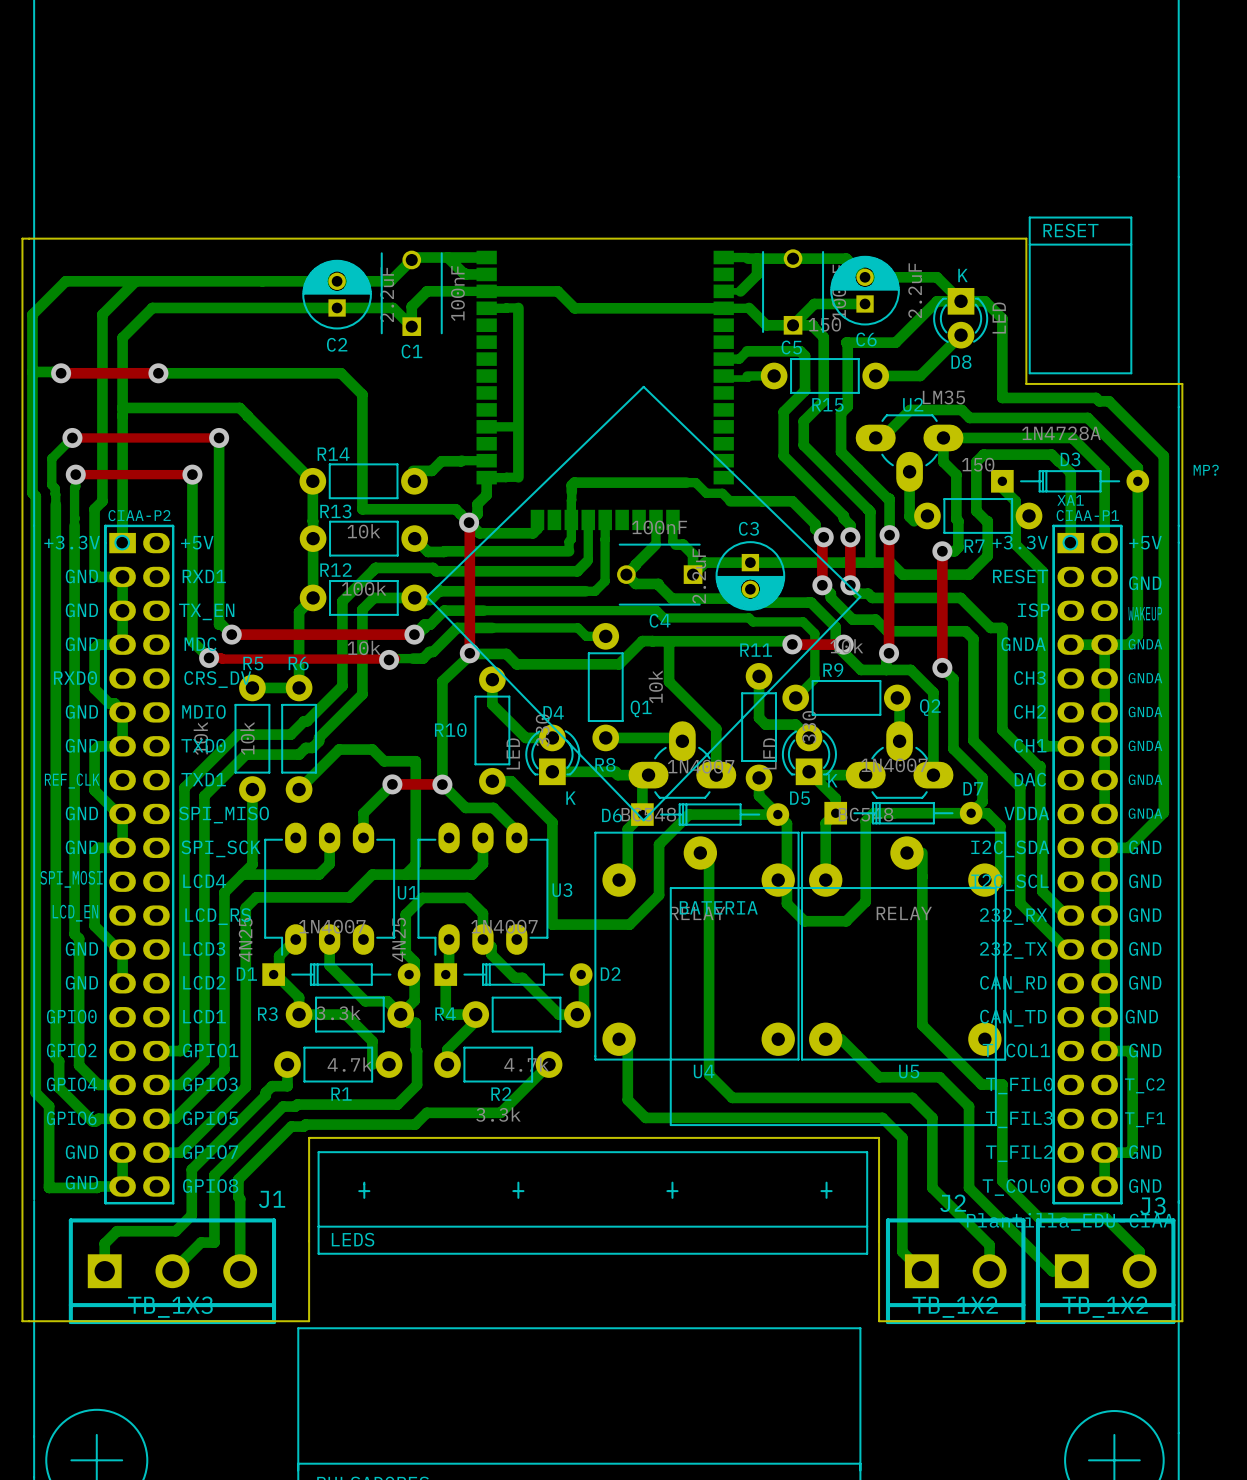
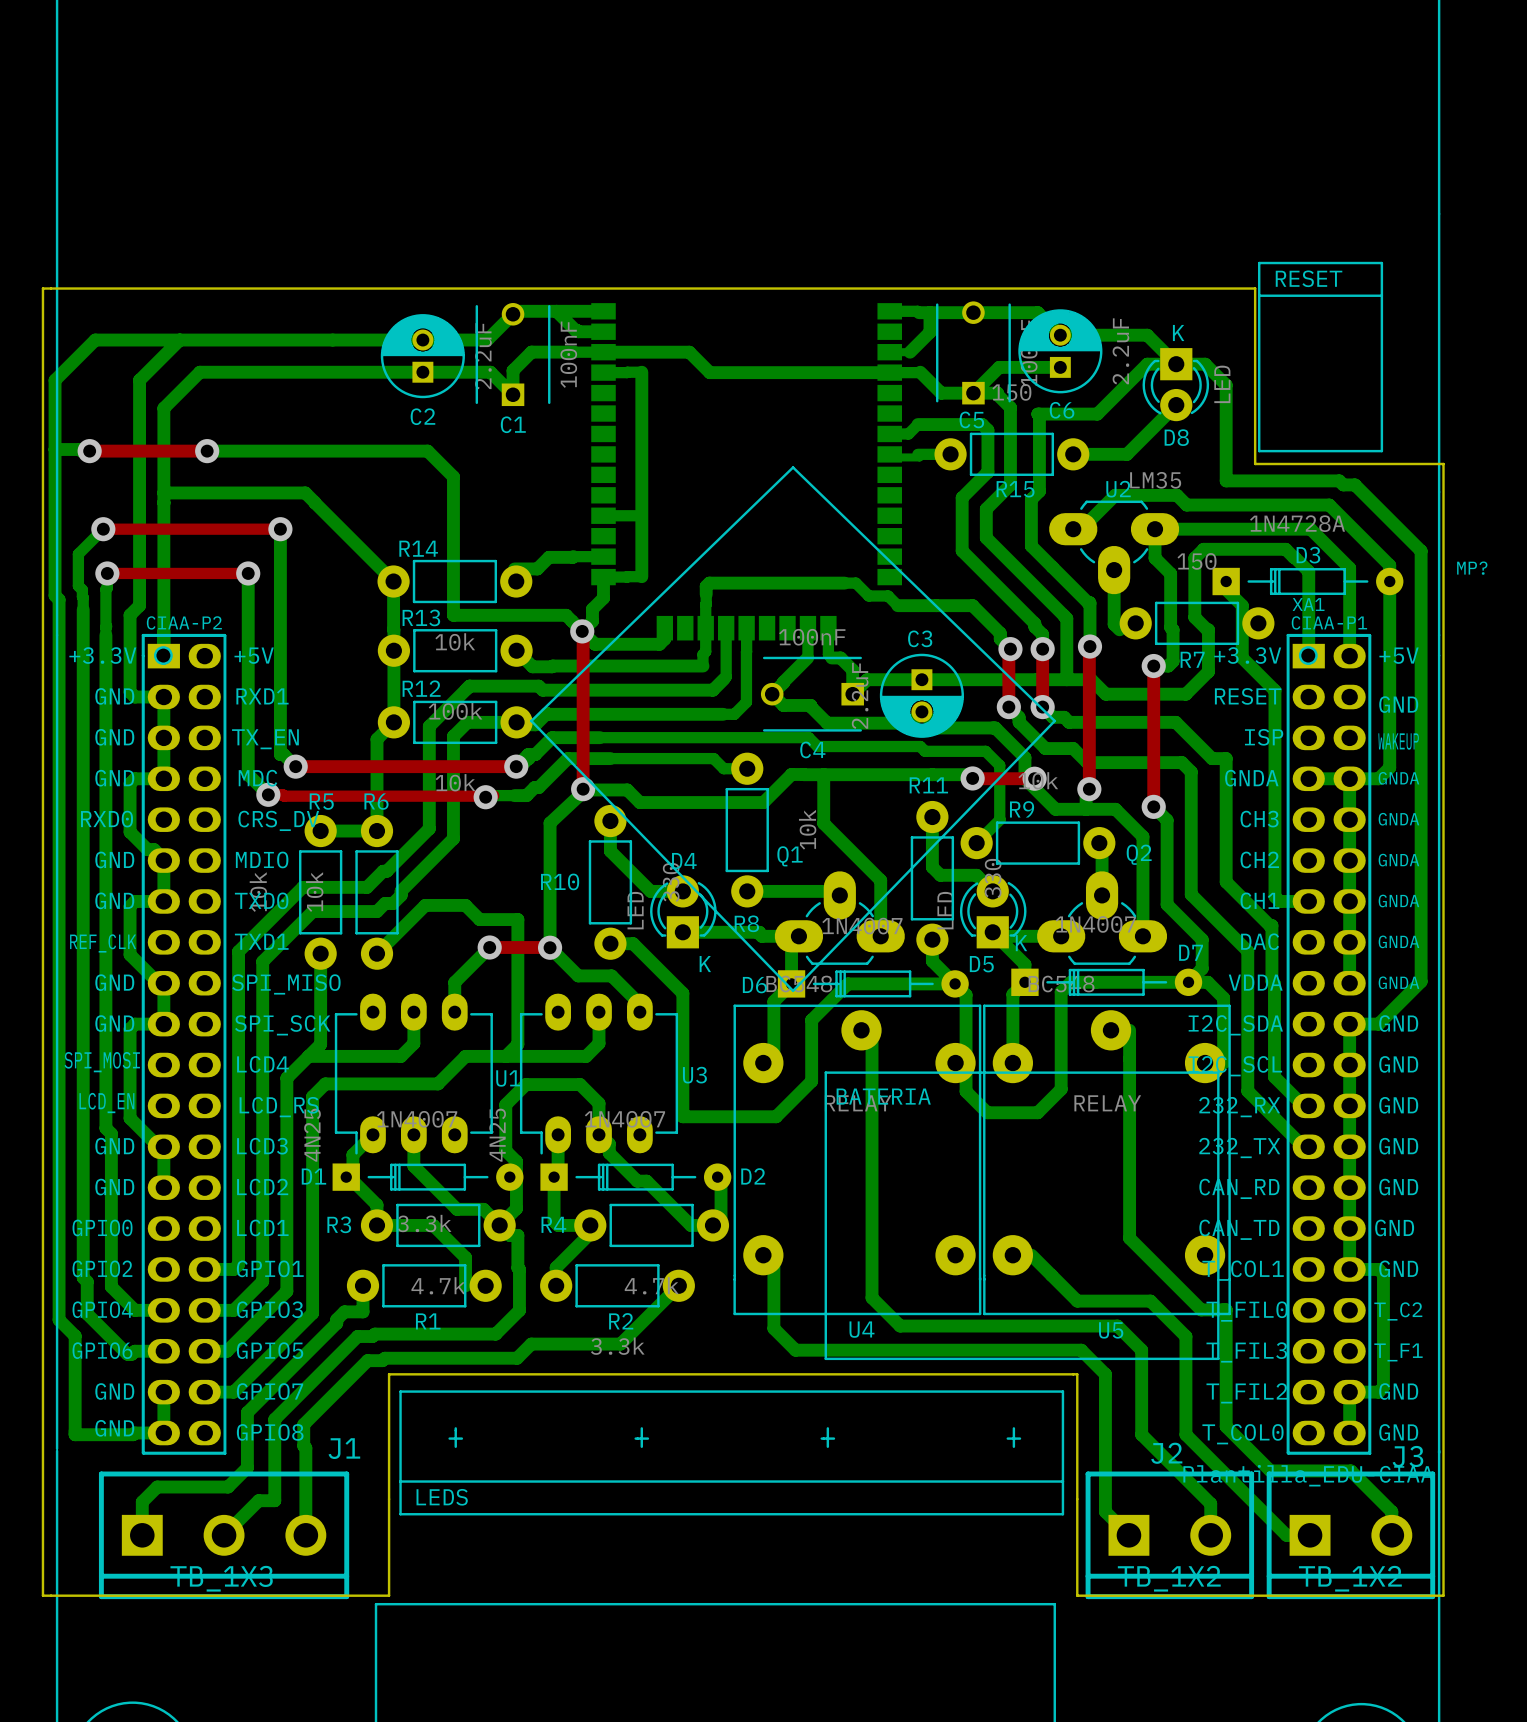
U4 footprint: [594, 831, 800, 1061] -> [733, 1004, 982, 1316]
U5 footprint: [801, 831, 1007, 1061] -> [983, 1004, 1231, 1316]

